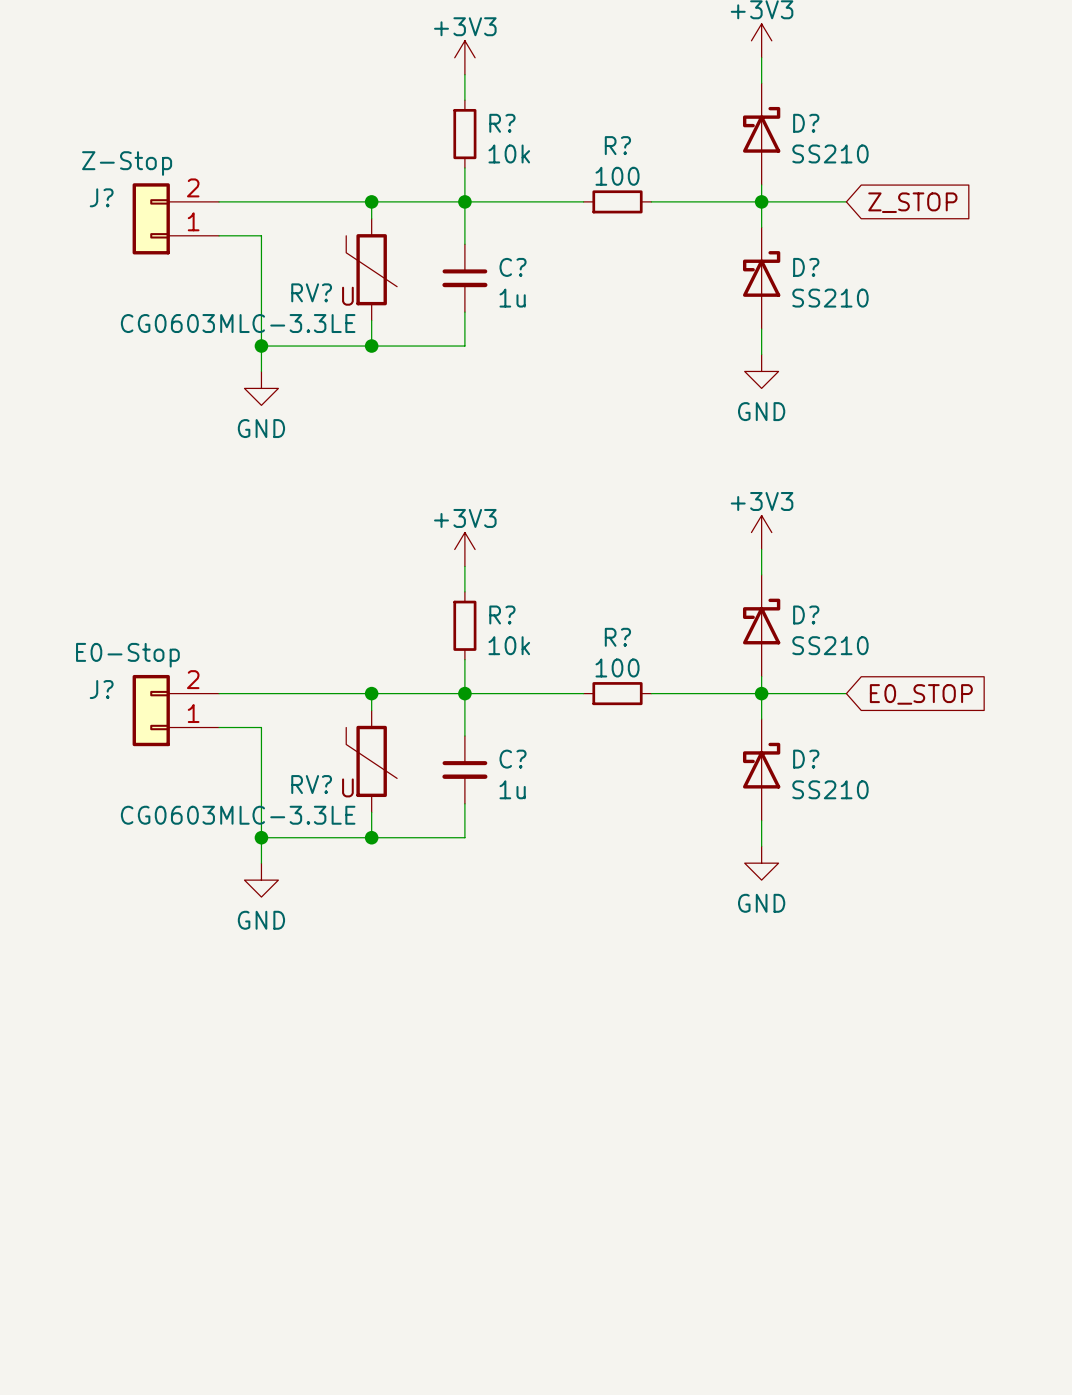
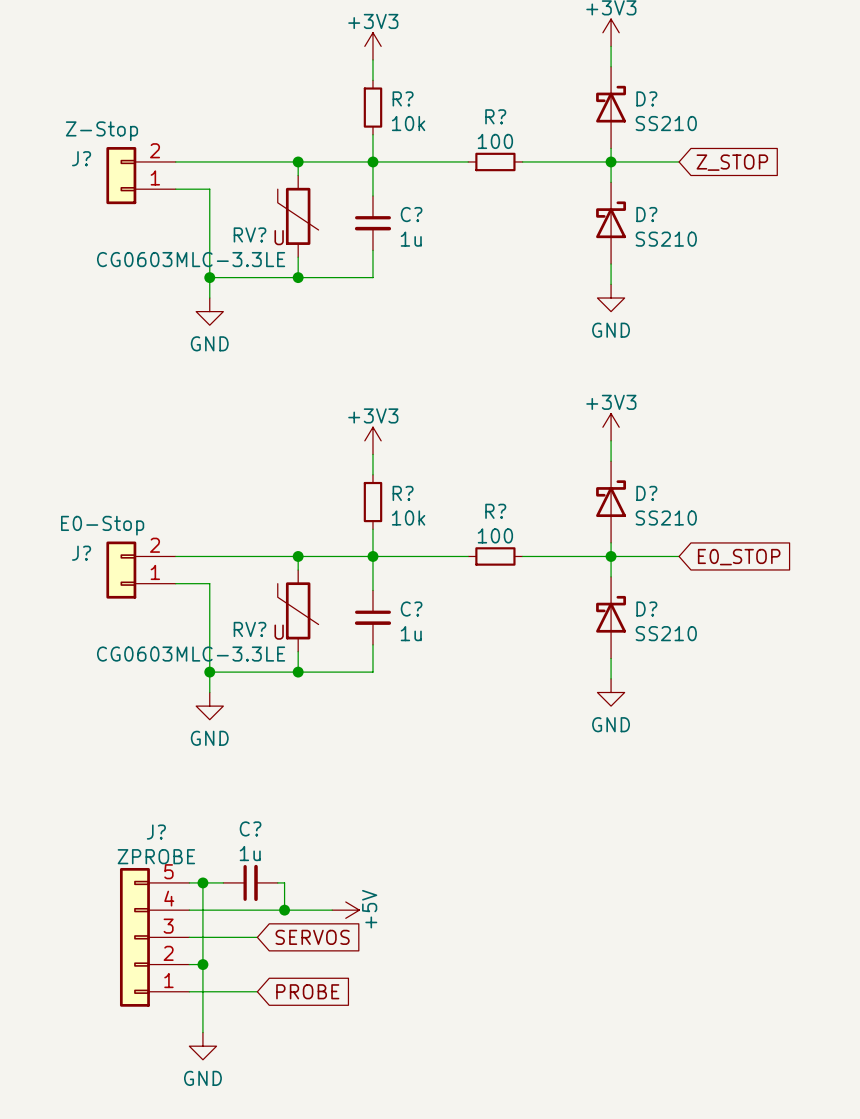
wire: none -> (189, 882) (223, 882)
wire: none -> (202, 882) (202, 1032)
junction: none -> (202, 882)
C?: none -> 1u (250, 882)
wire: none -> (277, 882) (284, 882) (284, 910)
wire: none -> (189, 910) (332, 910)
junction: none -> (284, 910)
power symbol: none -> +5V (345, 910)
J?: none -> ZPROBE (154, 937)
wire: none -> (189, 937) (257, 937)
global label: none -> SERVOS (312, 937)
wire: none -> (189, 964) (202, 964)
junction: none -> (202, 964)
wire: none -> (189, 991) (257, 991)
global label: none -> PROBE (307, 991)
power symbol: none -> GND (202, 1046)

